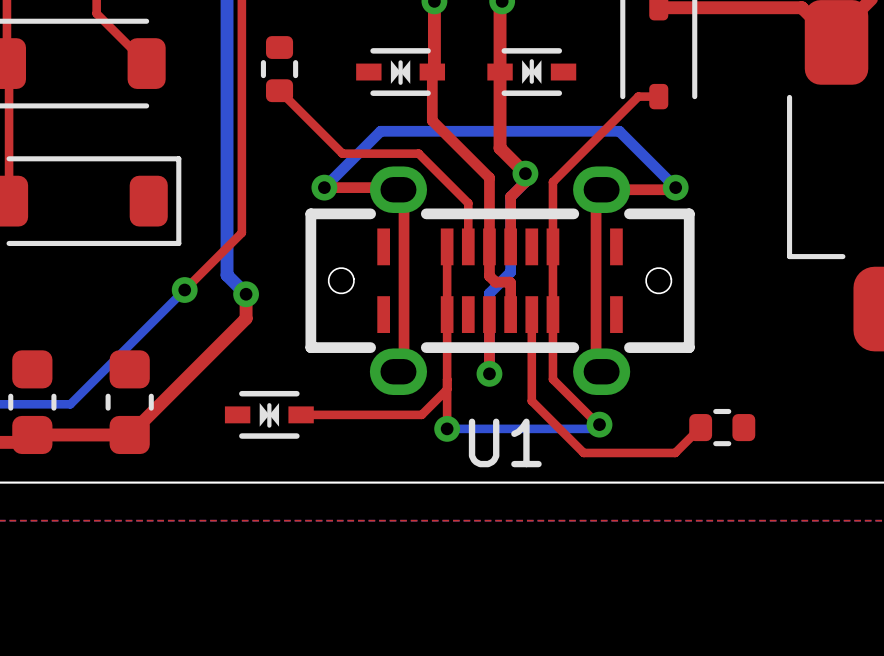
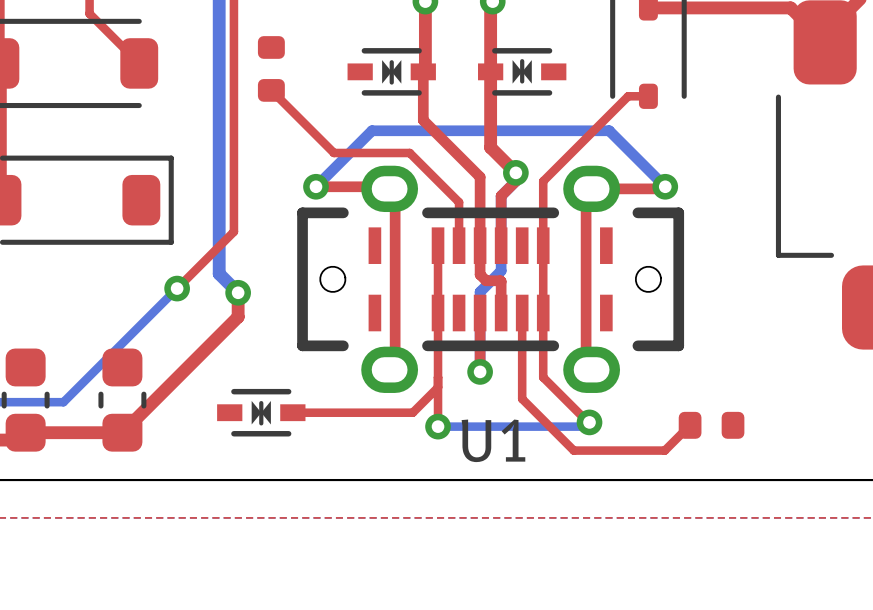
part footprint: [260, 36, 299, 103] -> [257, 36, 285, 102]
U1 footprint: [305, 166, 695, 396] -> [297, 165, 685, 393]
part footprint: [689, 408, 756, 447] -> [678, 411, 745, 439]

